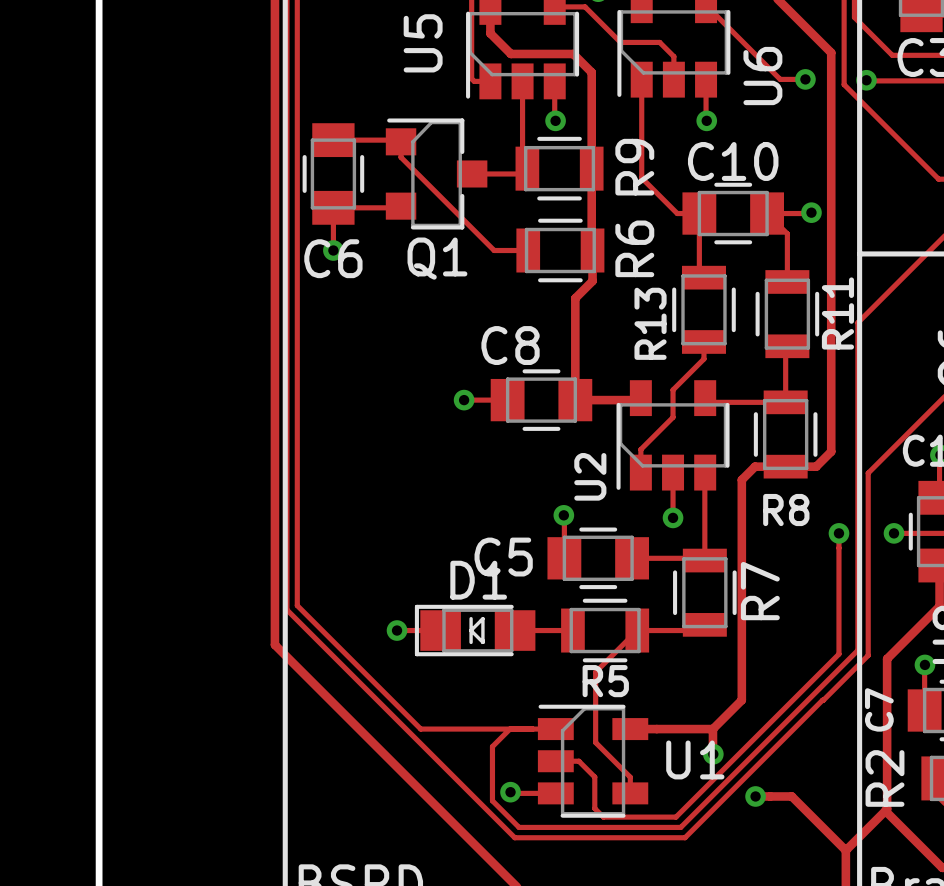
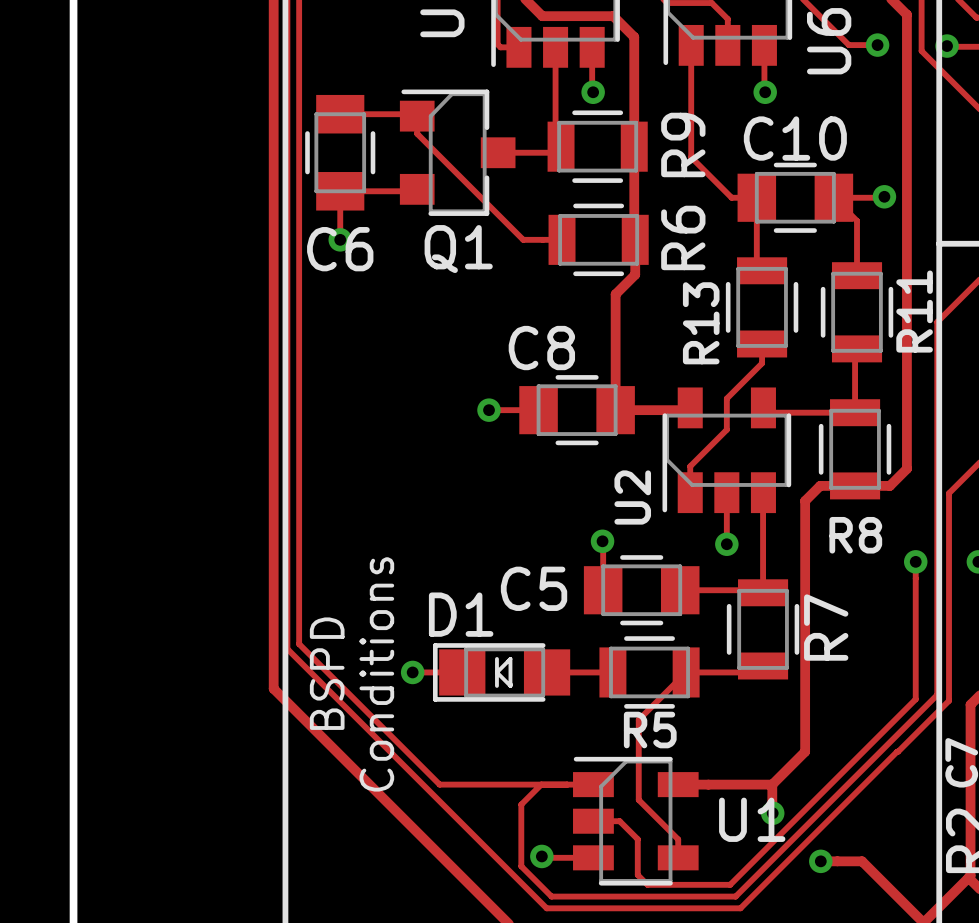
D1 name position: D1 (478, 580) -> D1 (461, 614)
text: none -> BSPD (327, 673)
text: none -> Conditions (376, 674)

